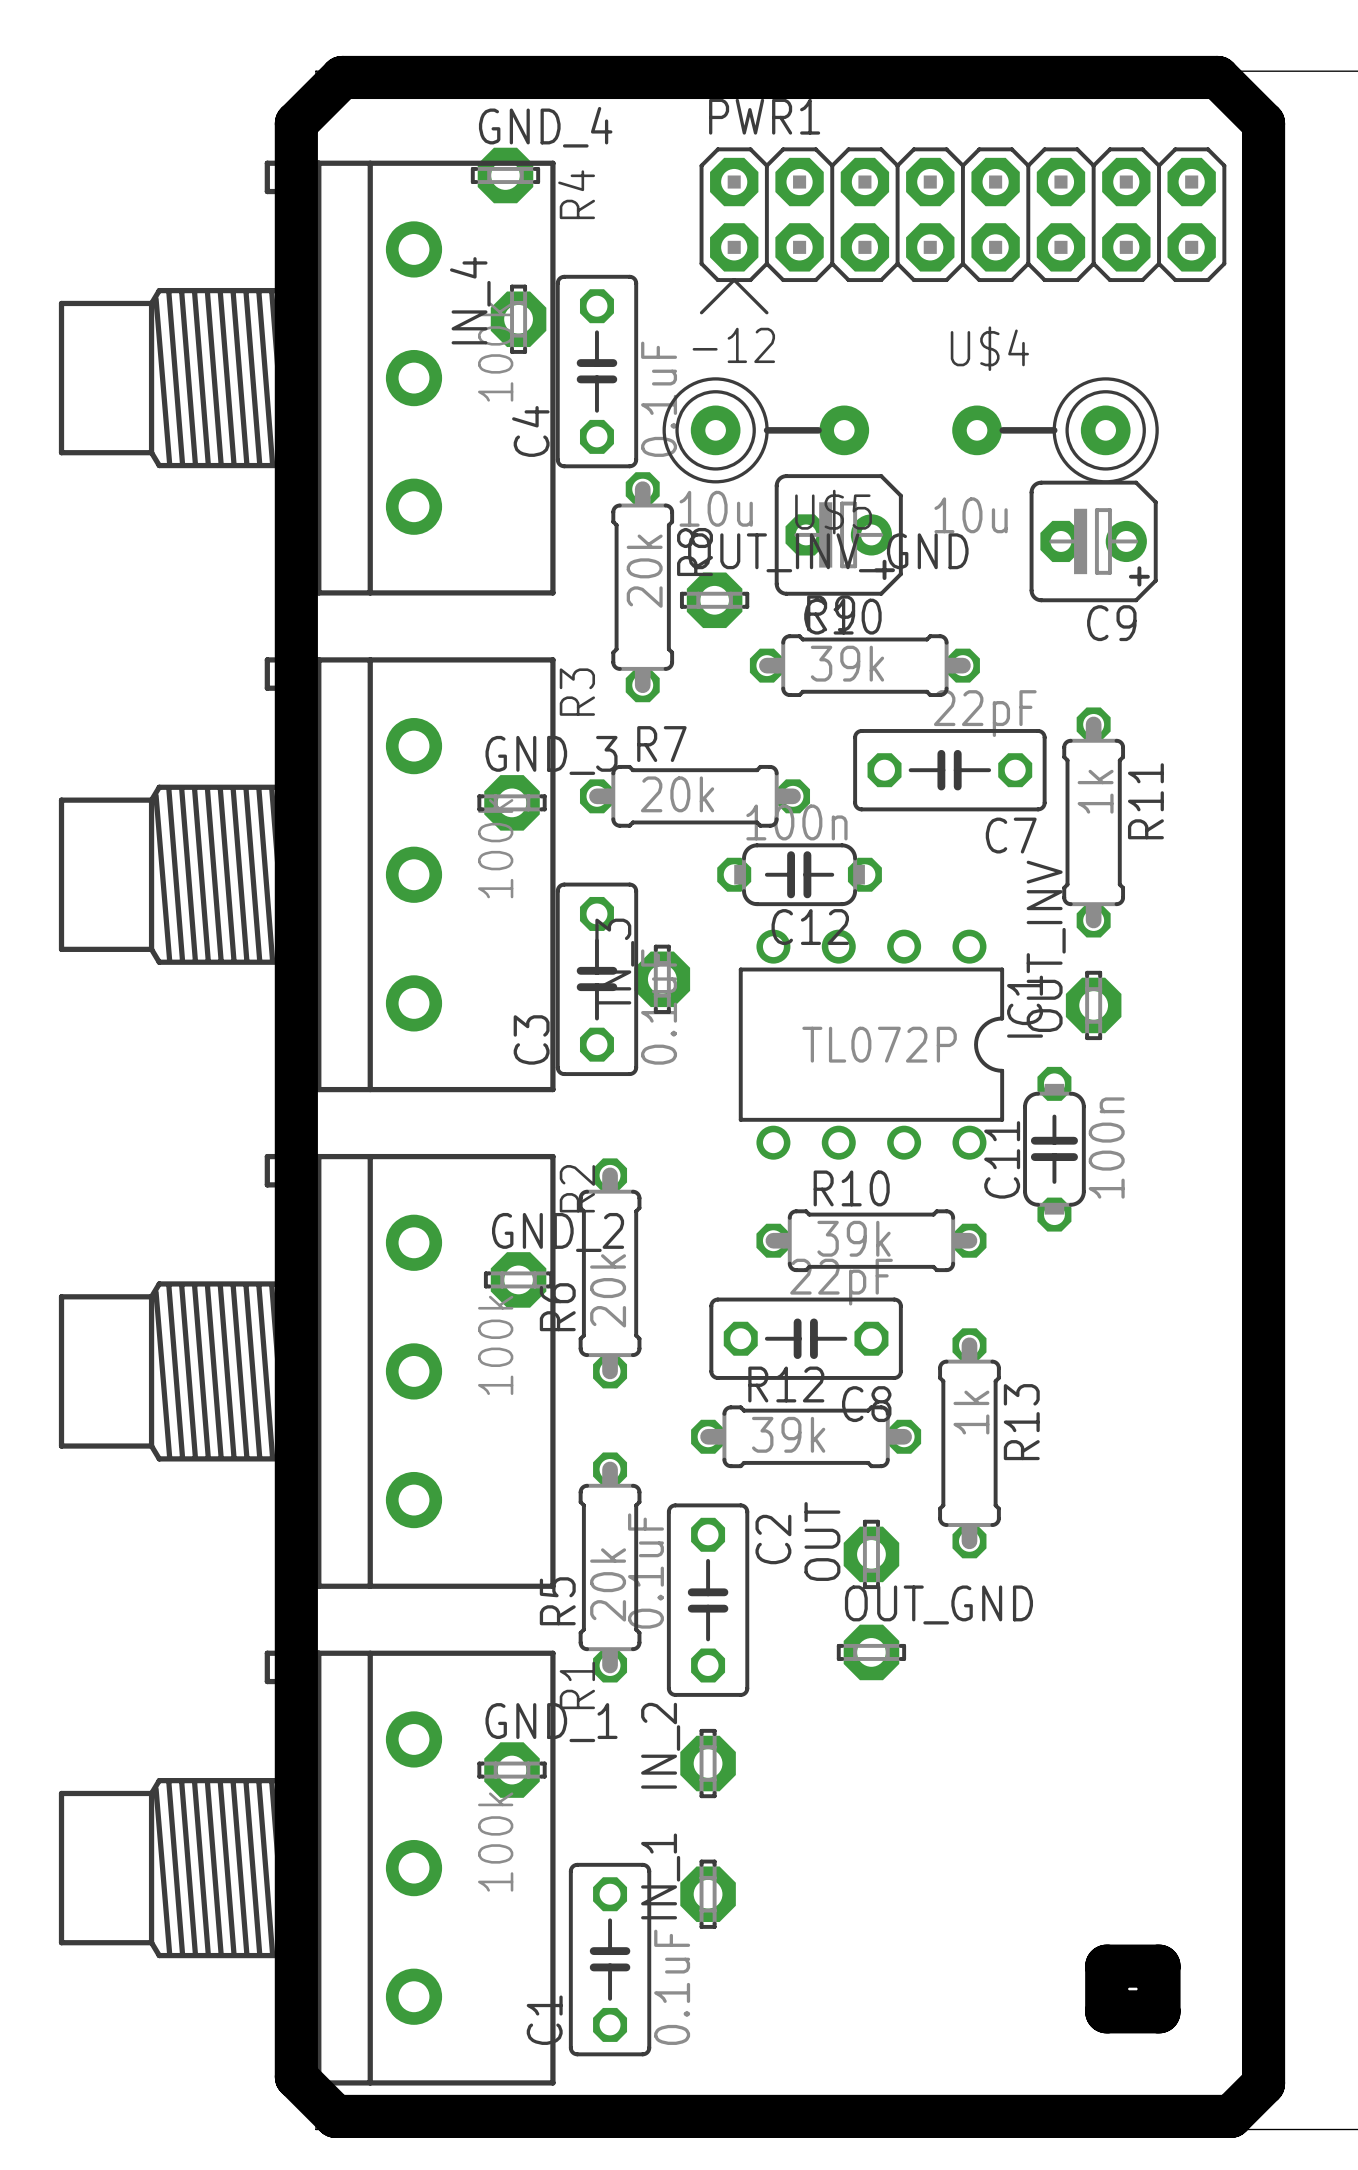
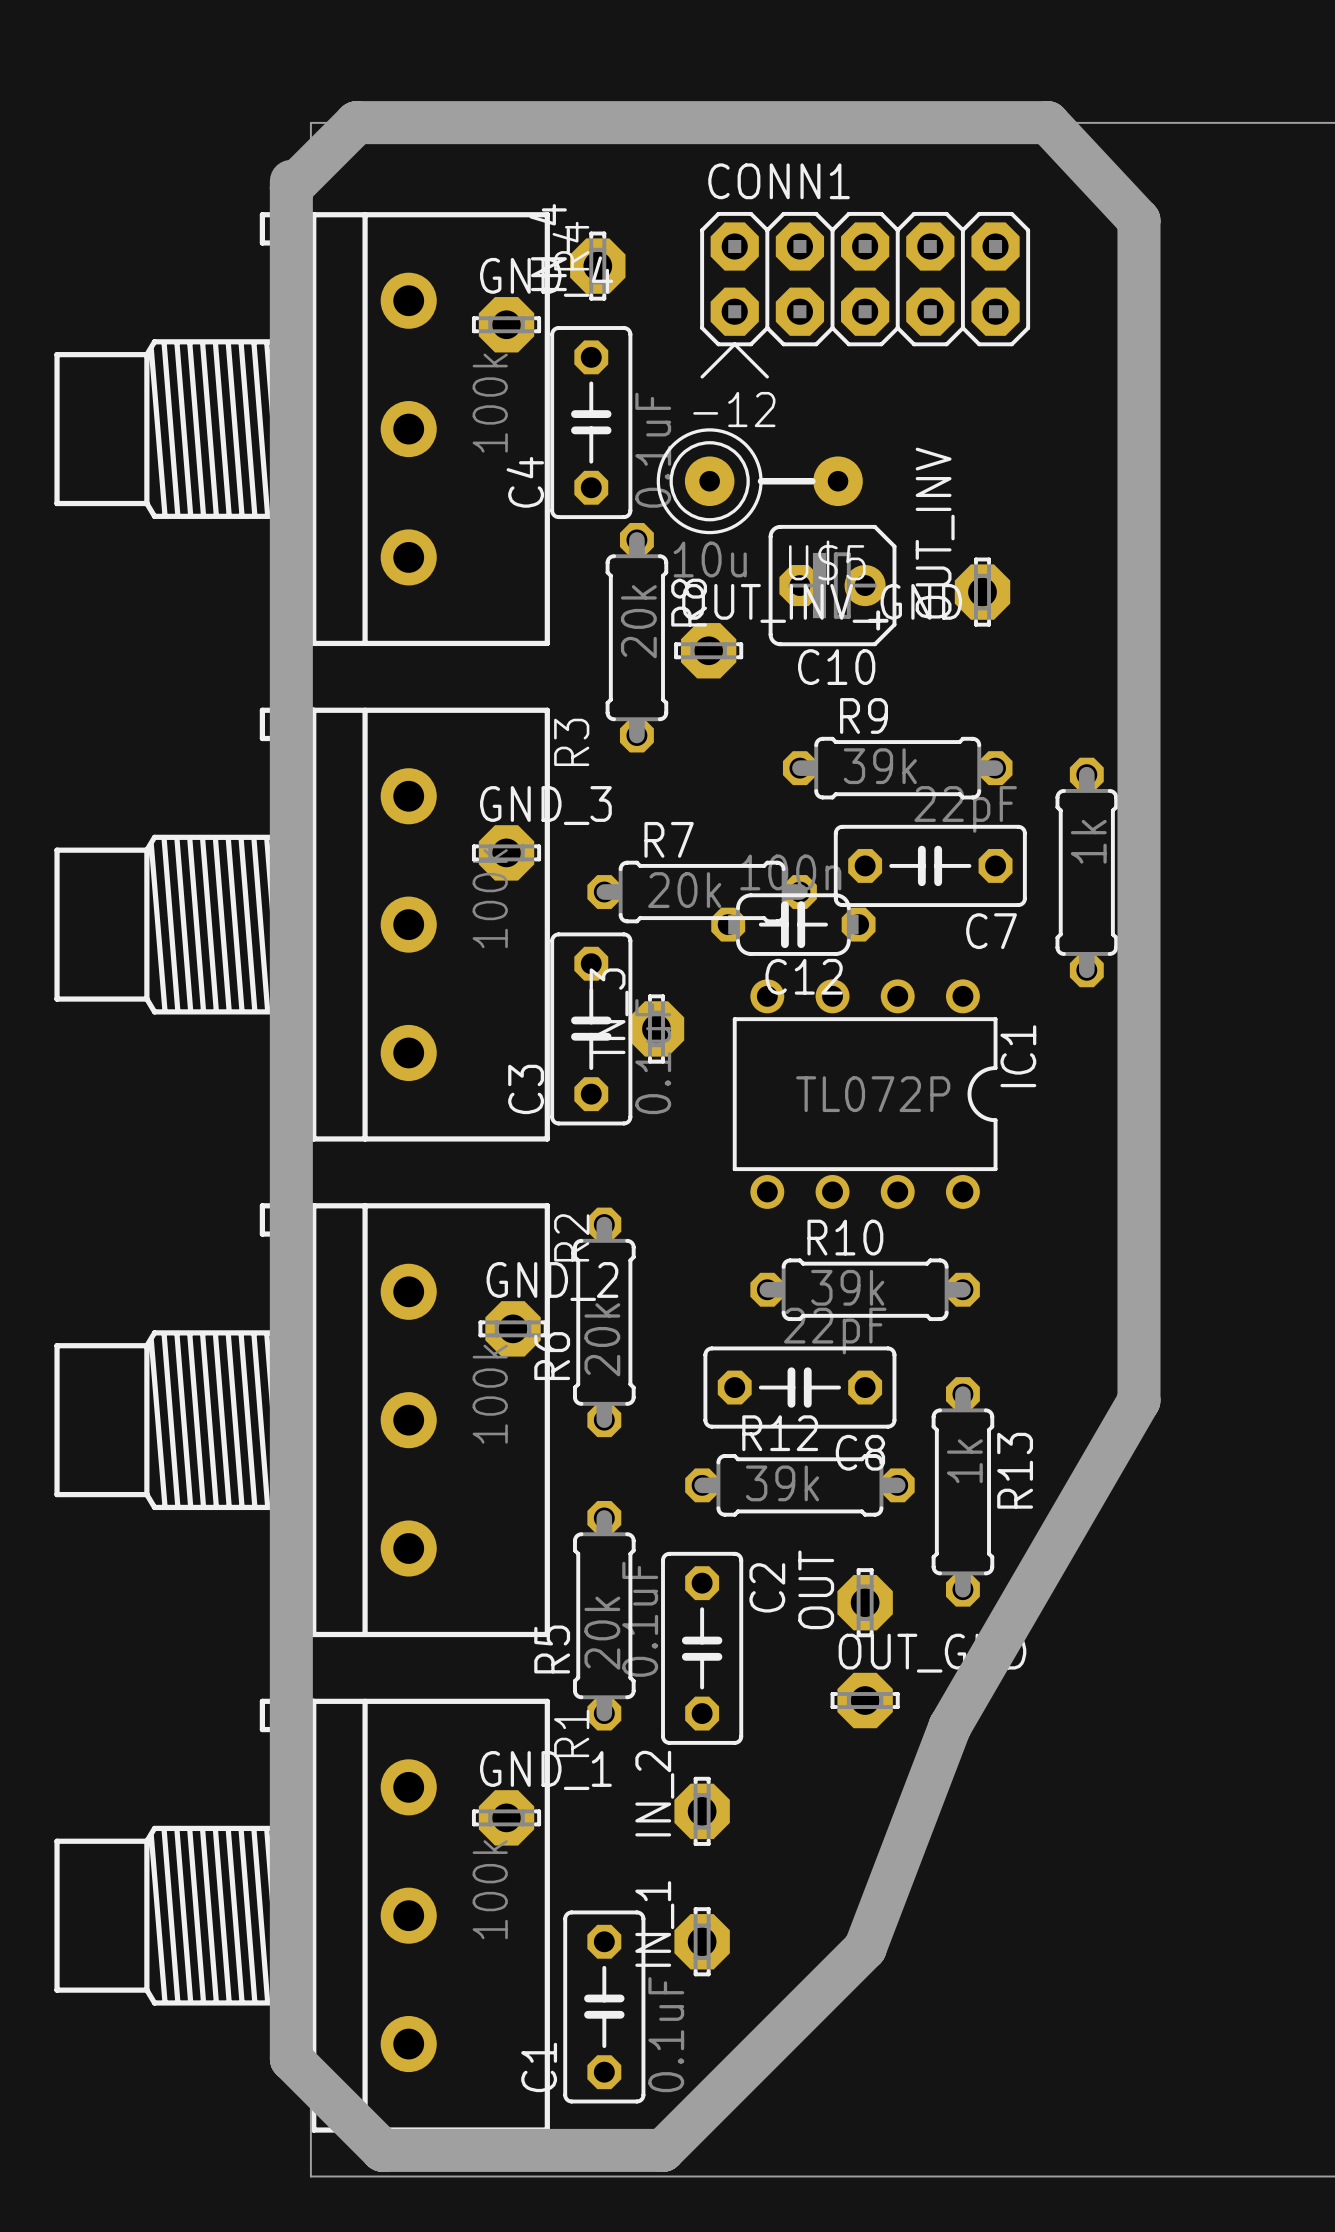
board edge: (296, 129) (296, 123) (342, 77) (1217, 77) (1263, 123) (1263, 2083) (1230, 2116) (335, 2116) (296, 2077) (296, 2011) -> (291, 187) (356, 122) (1047, 122) (1138, 220) (1138, 1400) (949, 1726) (865, 1948) (663, 2150) (382, 2150) (291, 2059)
GND_4 position: (505, 175) -> (506, 324)
PWR1: (962, 230) -> none
CONN1: none -> (865, 295)
IN_4 position: (518, 319) -> (597, 266)
U$4: (1055, 430) -> none
C9: 10u (1093, 541) -> none
R9 position: (864, 665) -> (897, 768)
C7 position: (949, 770) -> (930, 865)
R7 position: (695, 796) -> (702, 892)
OUT_INV position: (1093, 1005) -> (982, 592)
C11: 100n (1054, 1149) -> none
board edge: (1106, 1966) (1159, 1966) (1159, 2011) (1106, 2011) (1106, 1966) -> none

